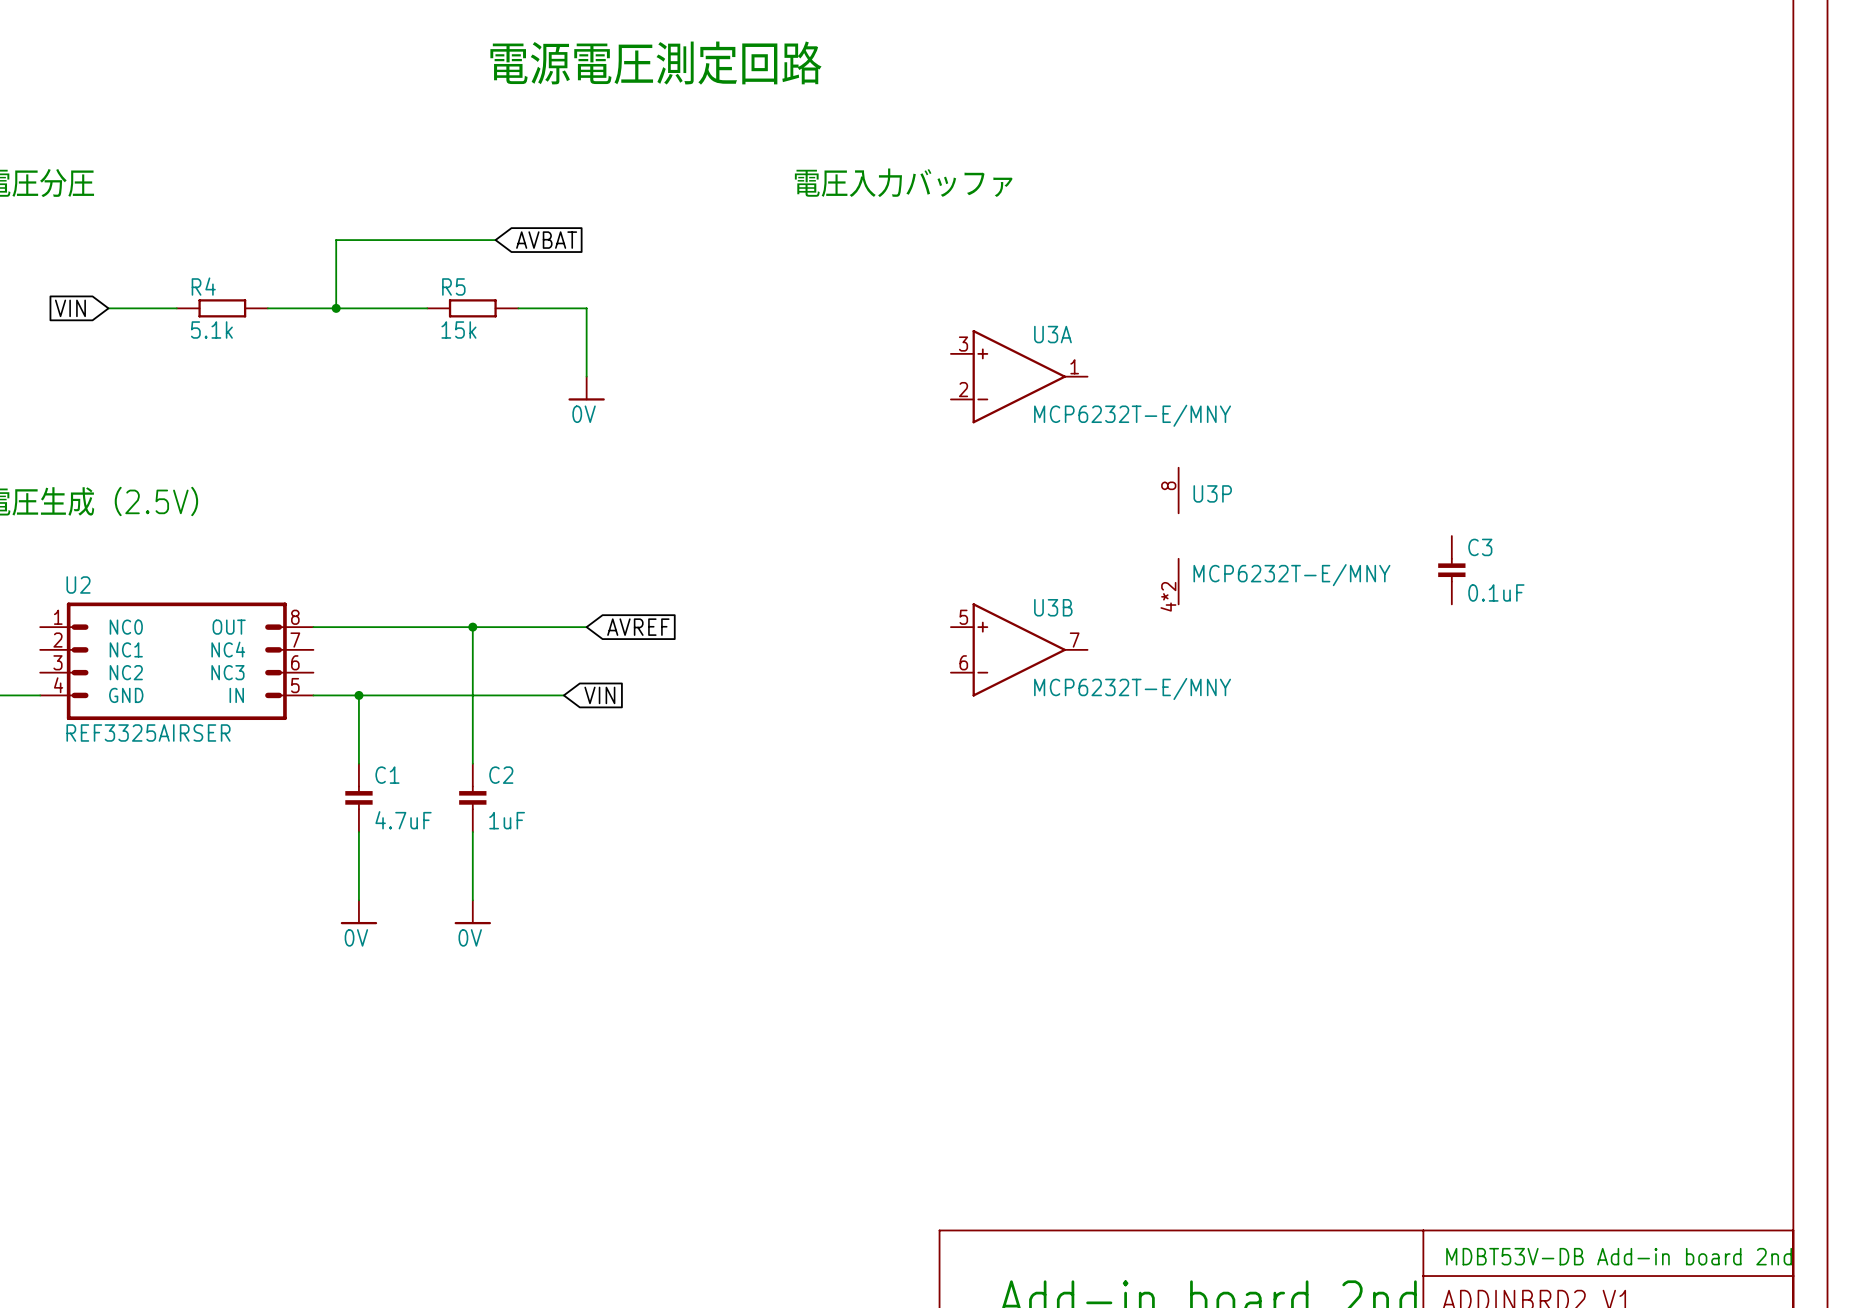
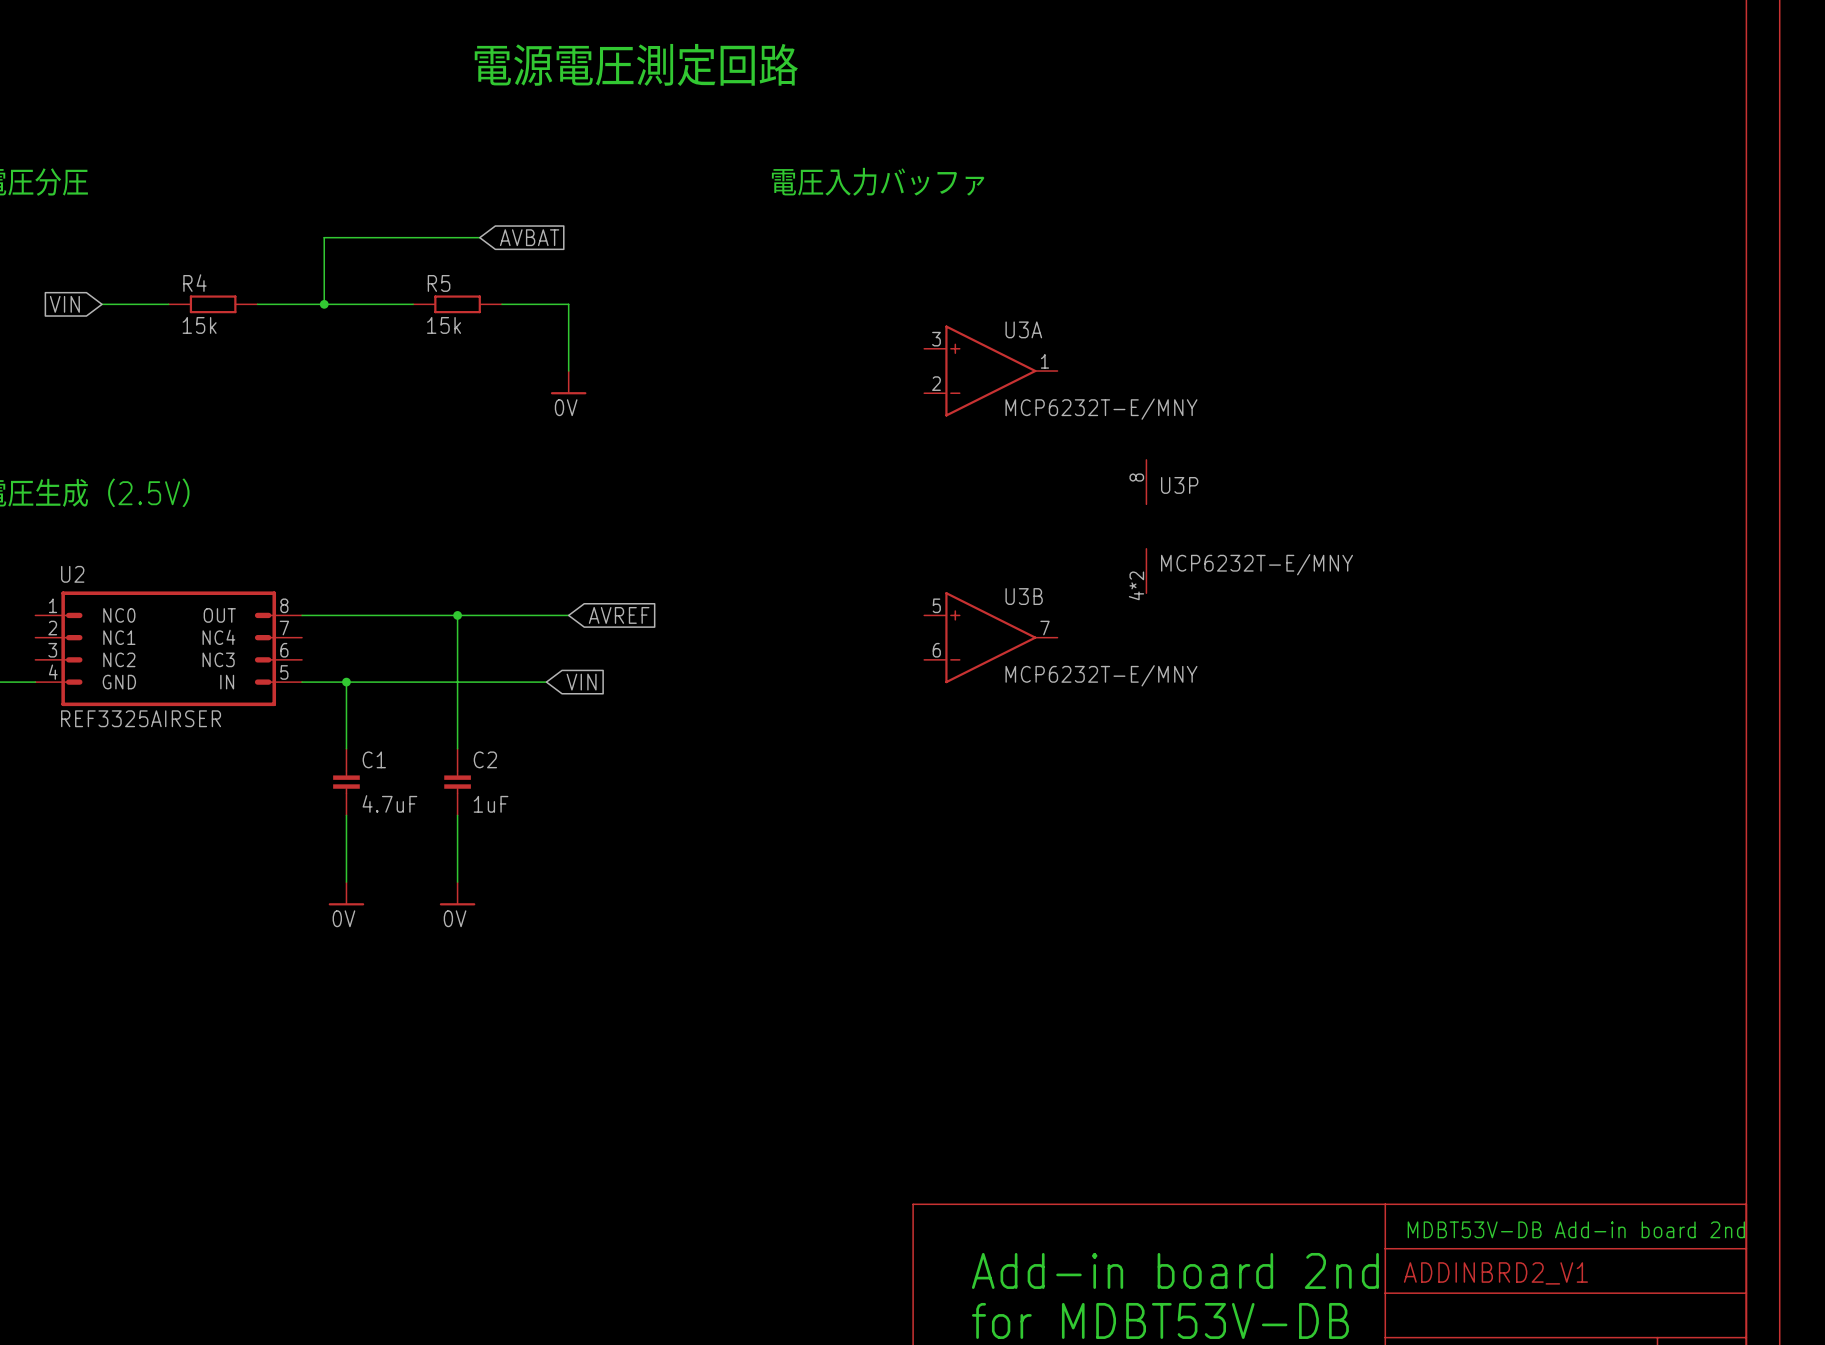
R4 value: 5.1k (211, 330) -> 15k (199, 325)
C3: 0.1uF (1451, 570) -> none

